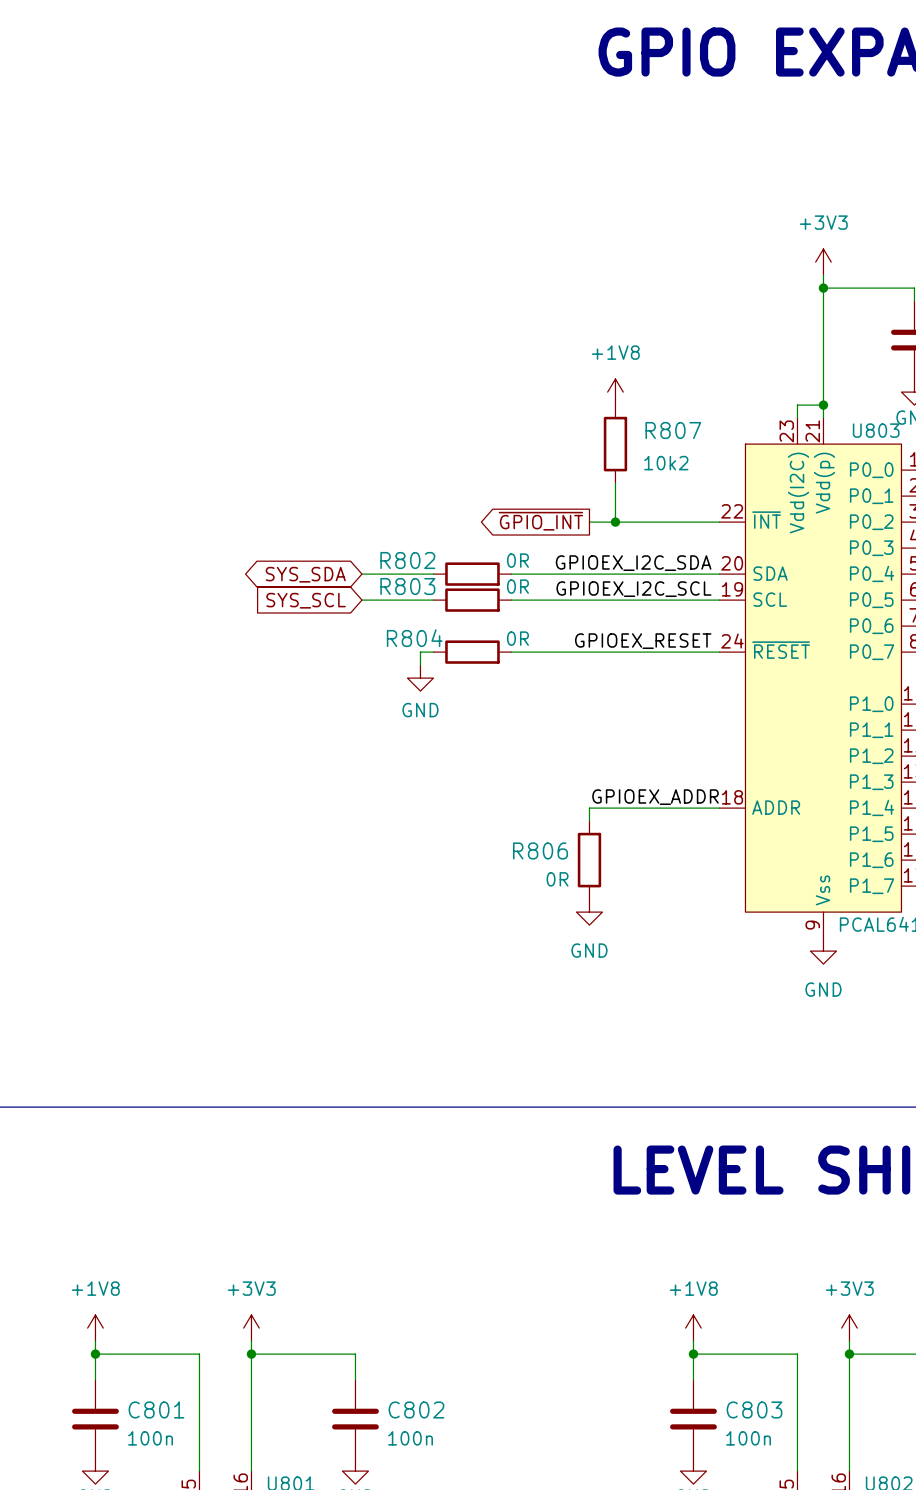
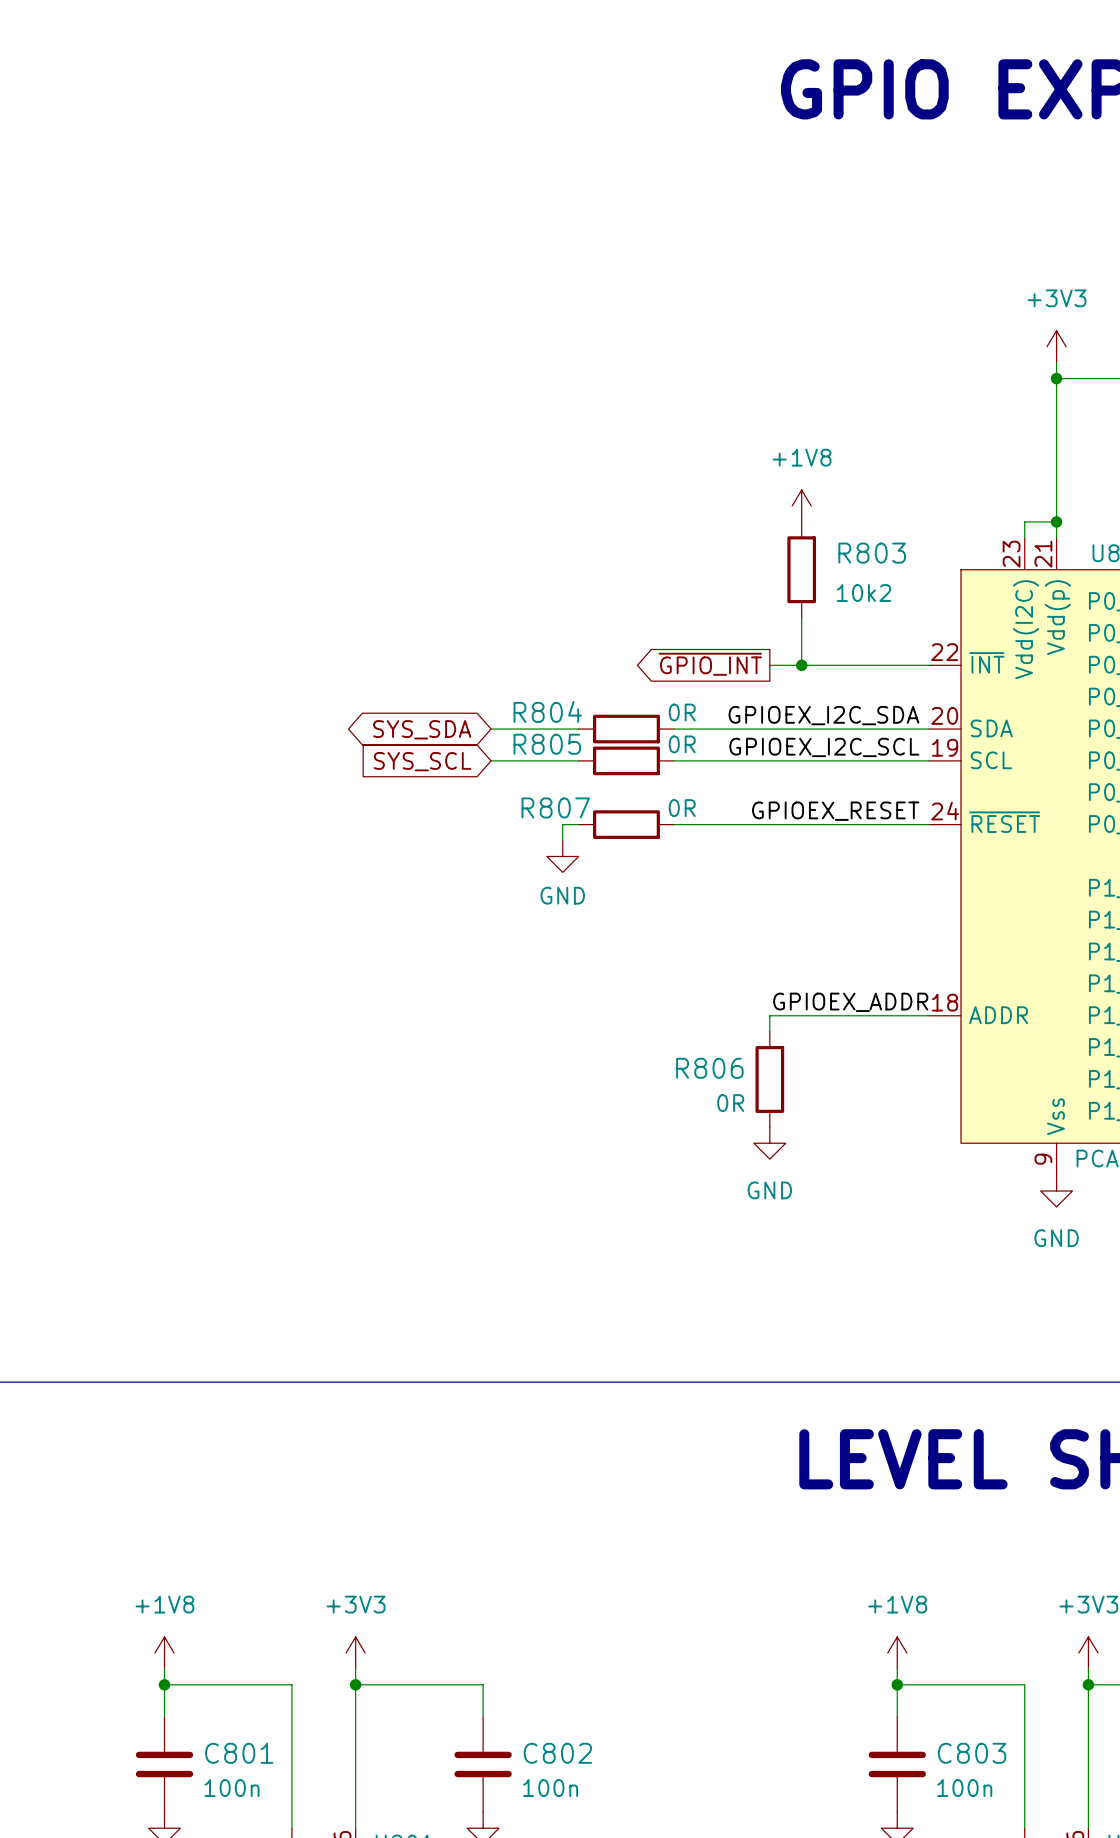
R807 name: R807 (673, 430) -> R803 (872, 553)
R802 name: R802 (407, 560) -> R804 (547, 711)
R803 name: R803 (407, 586) -> R805 (547, 744)
R804 name: R804 (414, 638) -> R807 (555, 807)

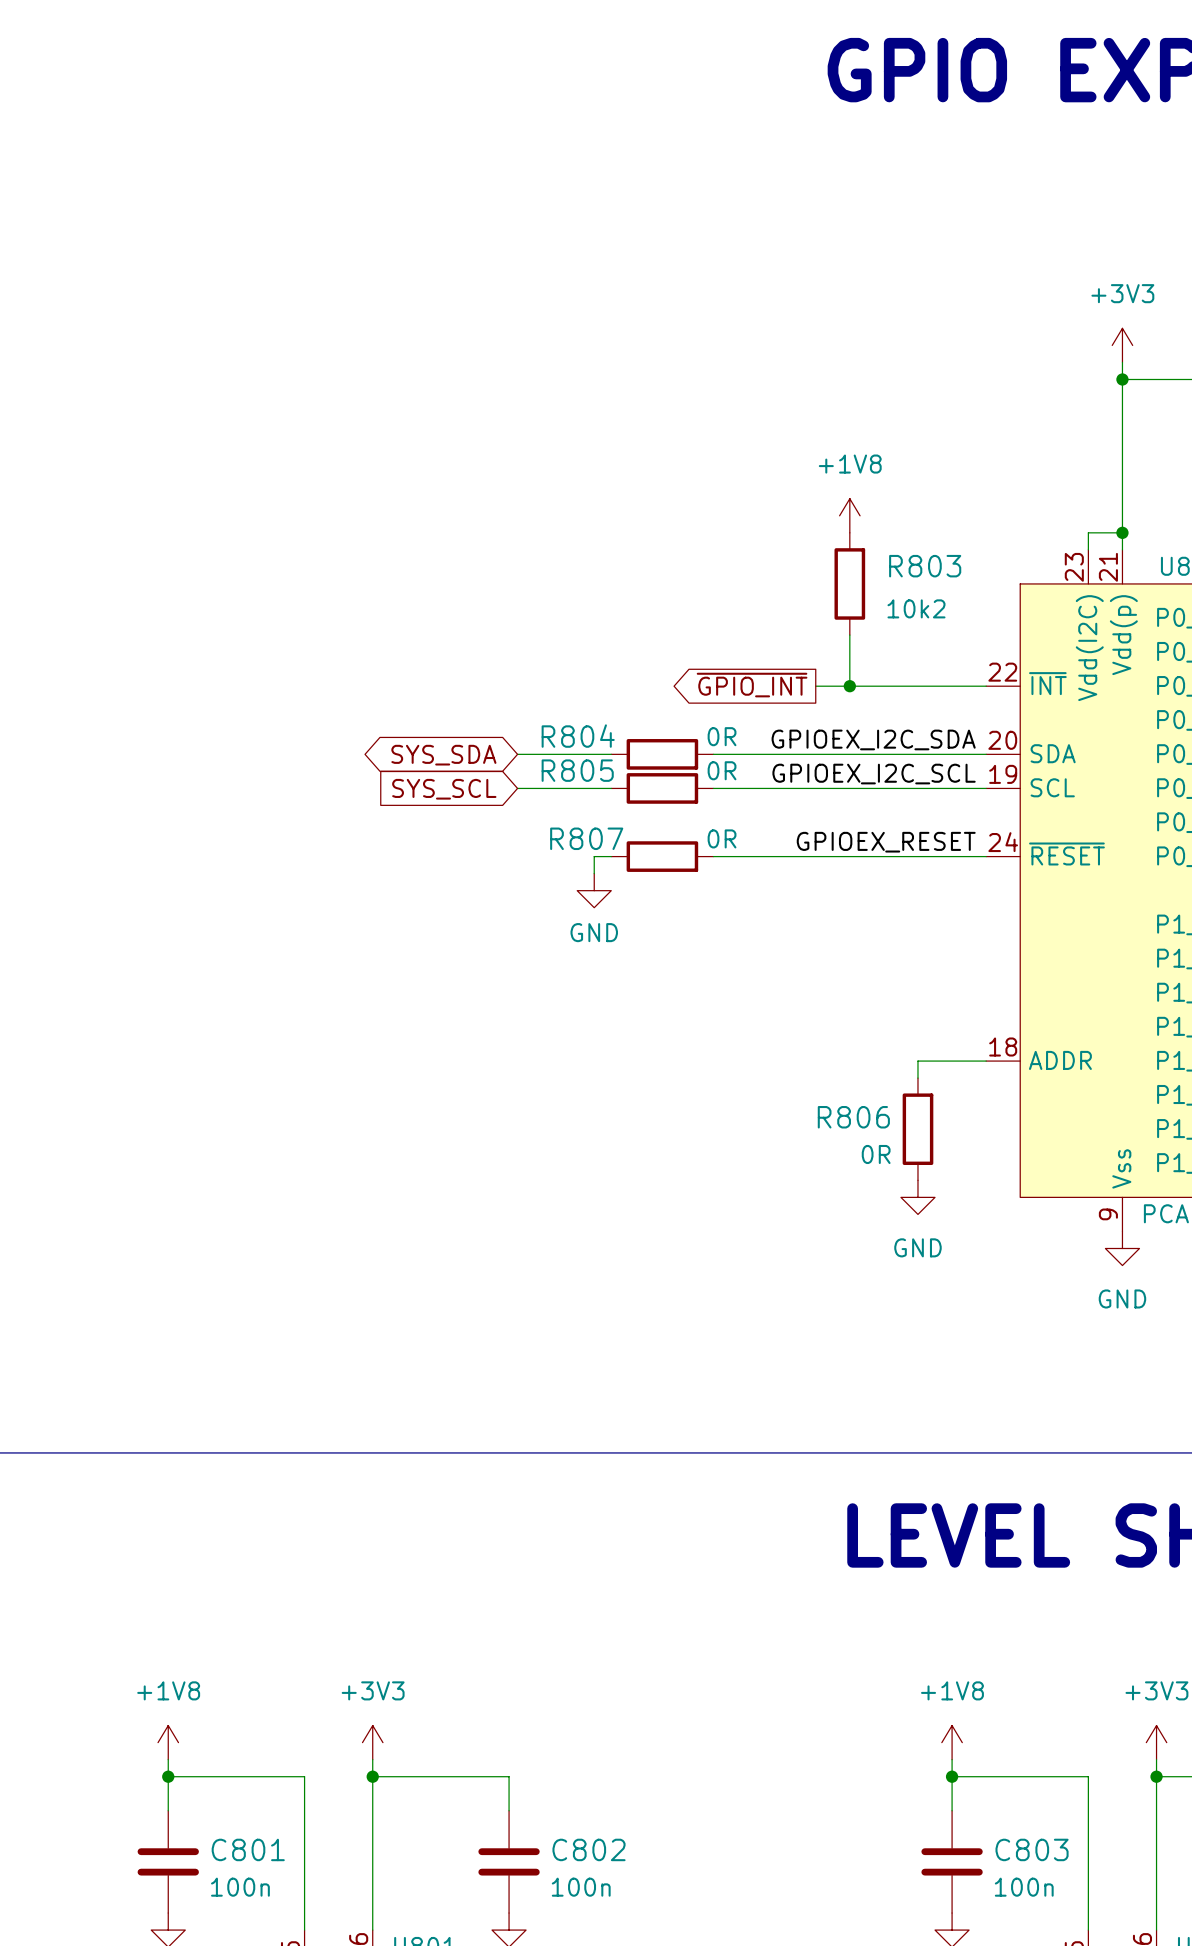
label: GPIOEX_ADDR (850, 1002) -> none
wire: (865, 1015) (769, 1015) (769, 1031) -> (917, 1061) (917, 1078)
R806 position: (769, 1079) -> (917, 1129)
power symbol position: GND (769, 1143) -> GND (917, 1197)

